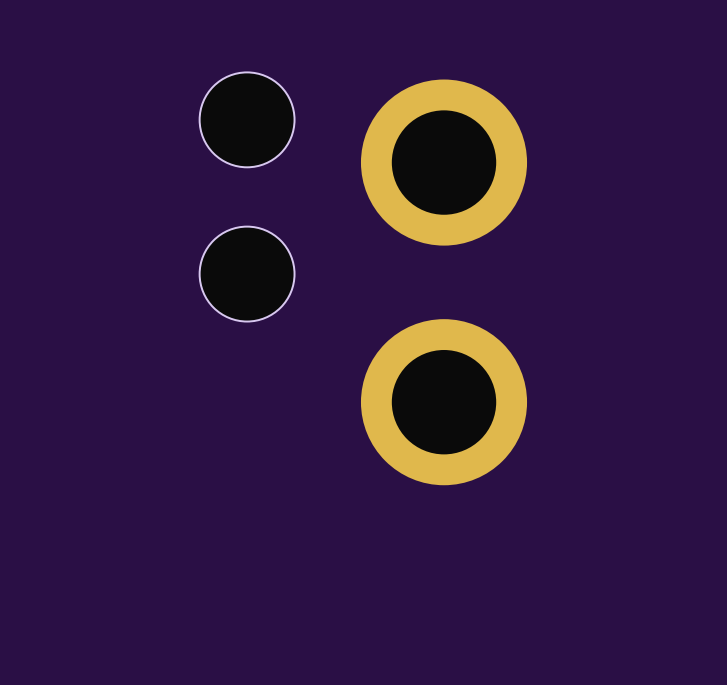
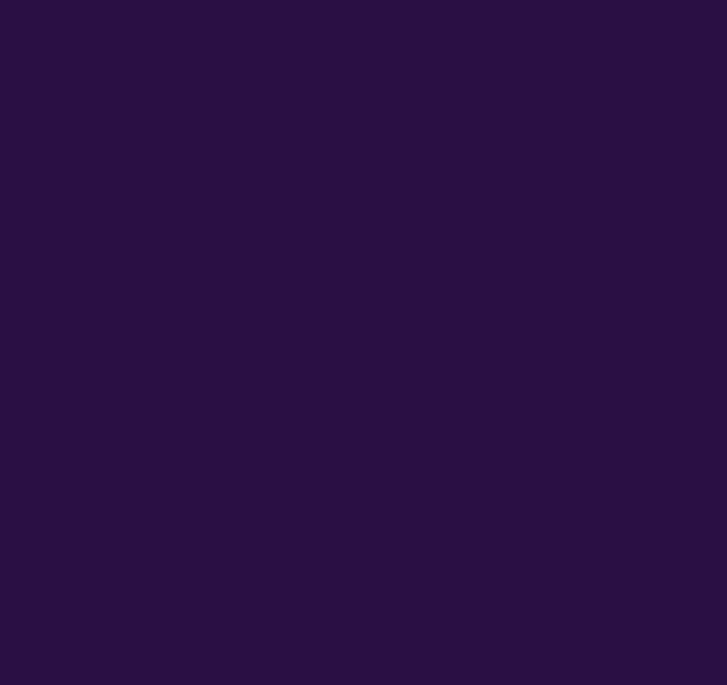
part: (247, 119) -> none
part: (444, 162) -> none
part: (247, 274) -> none
part: (444, 402) -> none

